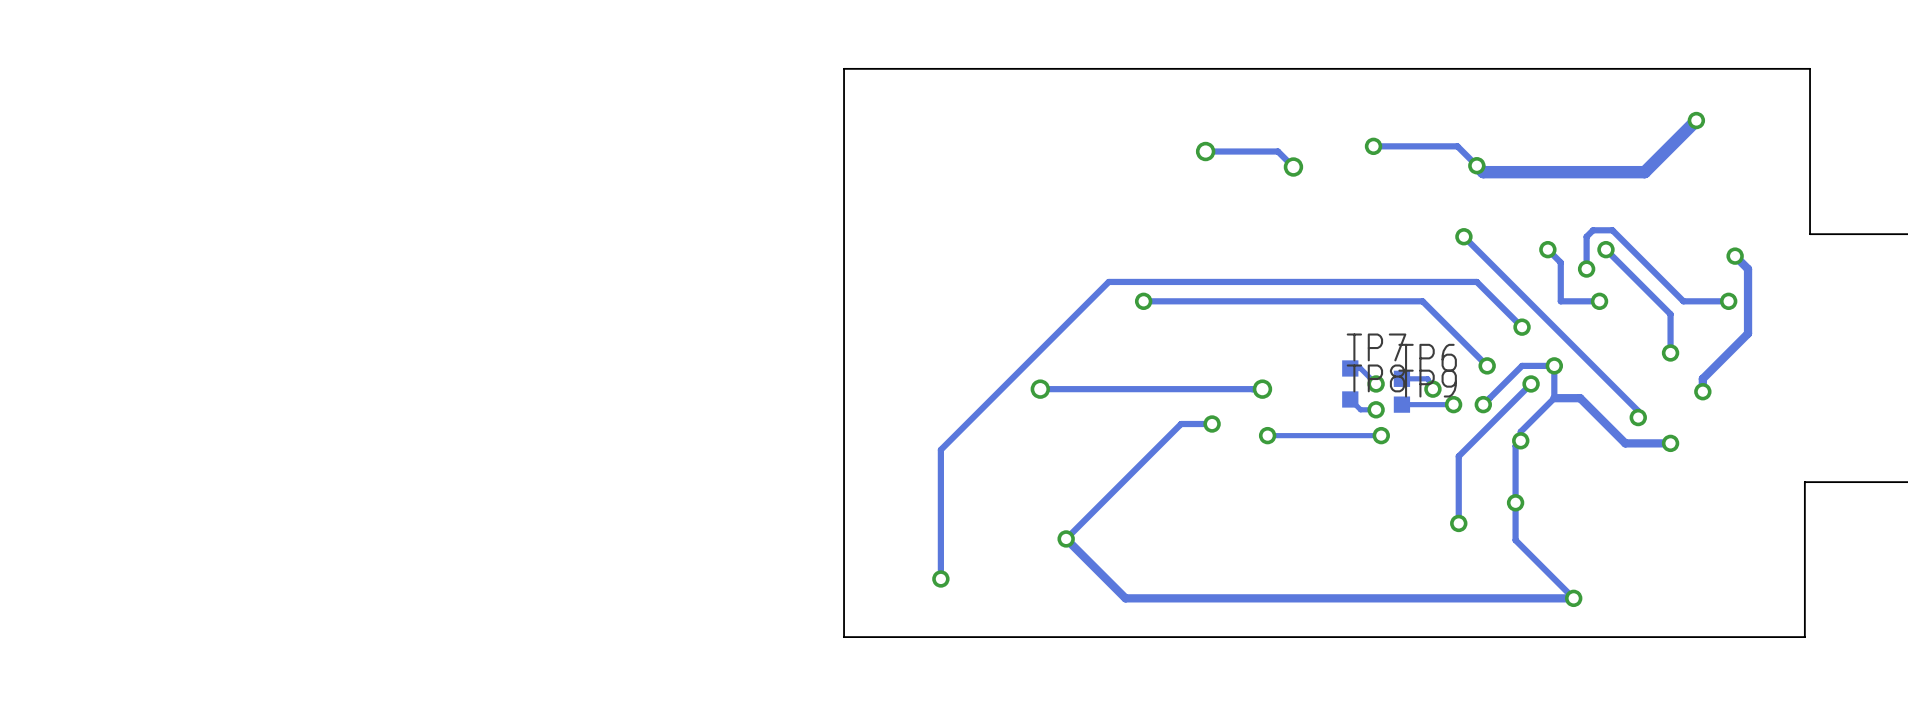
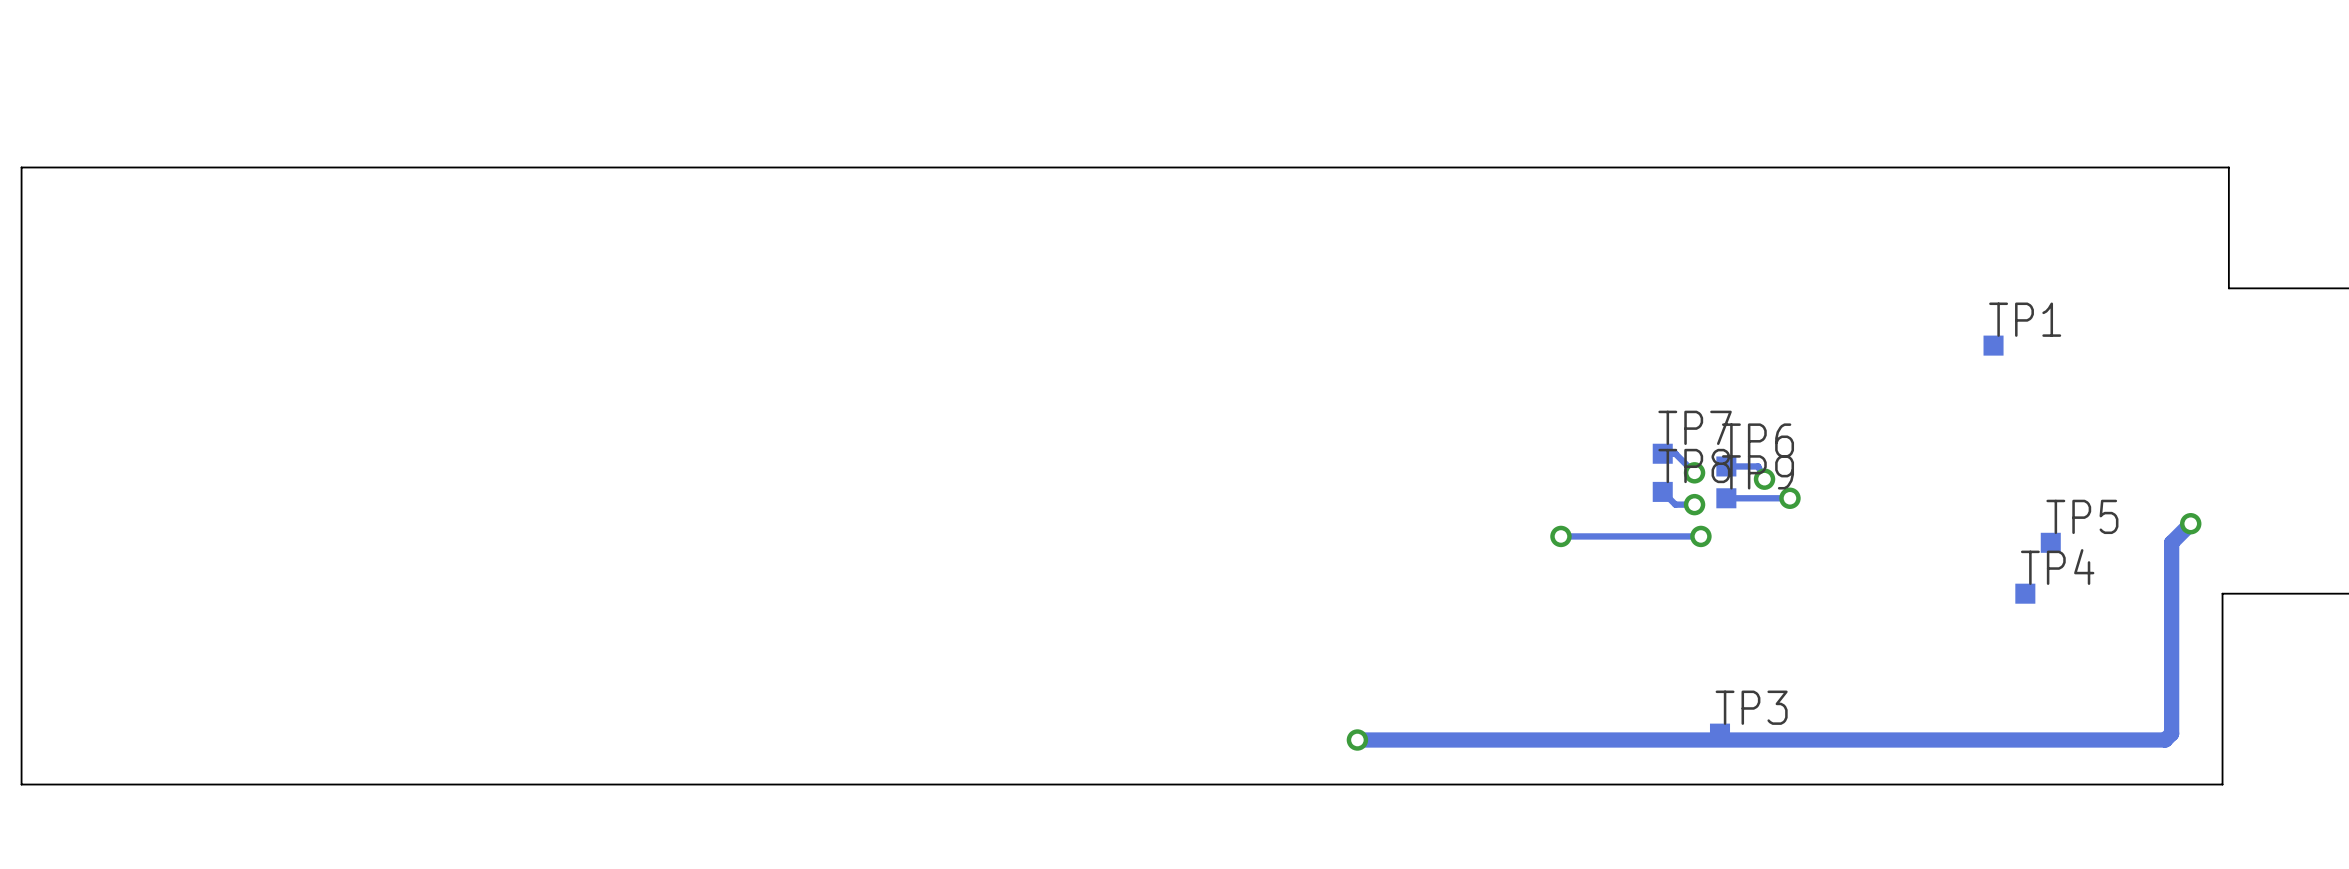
track: (1696, 120) (1644, 172) (1483, 172) (1457, 146) (1373, 146) -> none
via: (1696, 120) -> none
board edge: (1810, 136) (1810, 68) (844, 68) (844, 637) -> (2228, 167) (21, 167) (21, 784) (1039, 784)
via: (1373, 146) -> none
track: (1205, 151) (1277, 151) (1293, 167) -> none
via: (1205, 151) -> none
via: (1476, 165) -> none
via: (1293, 167) -> none
track: (1463, 236) (1638, 411) (1638, 417) -> none
via: (1463, 236) -> none
track: (1547, 249) (1560, 262) (1560, 301) (1599, 301) -> none
via: (1547, 249) -> none
track: (1605, 249) (1670, 314) (1670, 352) -> none
via: (1605, 249) -> none
track: (1735, 256) (1748, 269) (1748, 333) (1702, 378) (1702, 391) -> none
via: (1735, 256) -> none
track: (1586, 269) (1586, 236) (1593, 230) (1612, 230) (1683, 301) (1728, 301) -> none
via: (1586, 269) -> none
TP1: none -> (1993, 345)
track: (1143, 301) (1422, 301) (1487, 365) -> none
via: (1143, 301) -> none
via: (1599, 301) -> none
via: (1728, 301) -> none
track: (1522, 327) (1476, 281) (1108, 281) (940, 449) (940, 578) -> none
via: (1522, 327) -> none
via: (1670, 352) -> none
via: (1487, 365) -> none
via: (1554, 365) -> none
track: (1531, 383) (1458, 456) (1458, 523) -> none
via: (1531, 383) -> none
via: (1040, 389) -> none
track: (1262, 389) (1040, 389) -> none
via: (1262, 389) -> none
via: (1702, 391) -> none
track: (1554, 398) (1520, 431) (1520, 440) (1515, 445) (1515, 540) (1573, 598) (1125, 598) (1066, 538) (1181, 424) (1212, 424) -> none
track: (1554, 398) (1554, 365) (1522, 365) (1483, 404) -> none
track: (1554, 398) (1580, 398) (1625, 443) (1670, 443) -> none
via: (1483, 404) -> none
via: (1638, 417) -> none
via: (1212, 424) -> none
track: none -> (2190, 523) (2171, 542) (2171, 733) (2165, 740) (1357, 740)
via: none -> (2190, 523)
via: (1520, 440) -> none
TP5: none -> (2050, 542)
via: (1670, 443) -> none
TP4: none -> (2025, 593)
via: (1515, 502) -> none
via: (1458, 523) -> none
via position: (1066, 538) -> (1357, 740)
via: (940, 578) -> none
TP3: none -> (1720, 733)
via: (1573, 598) -> none

